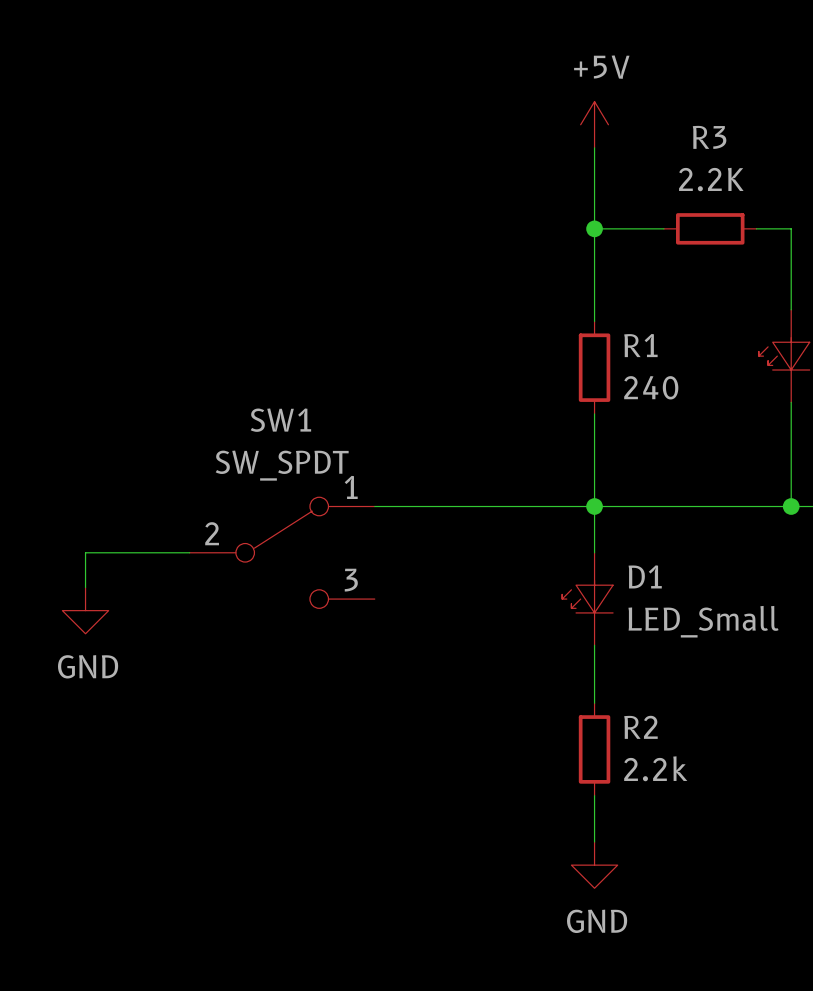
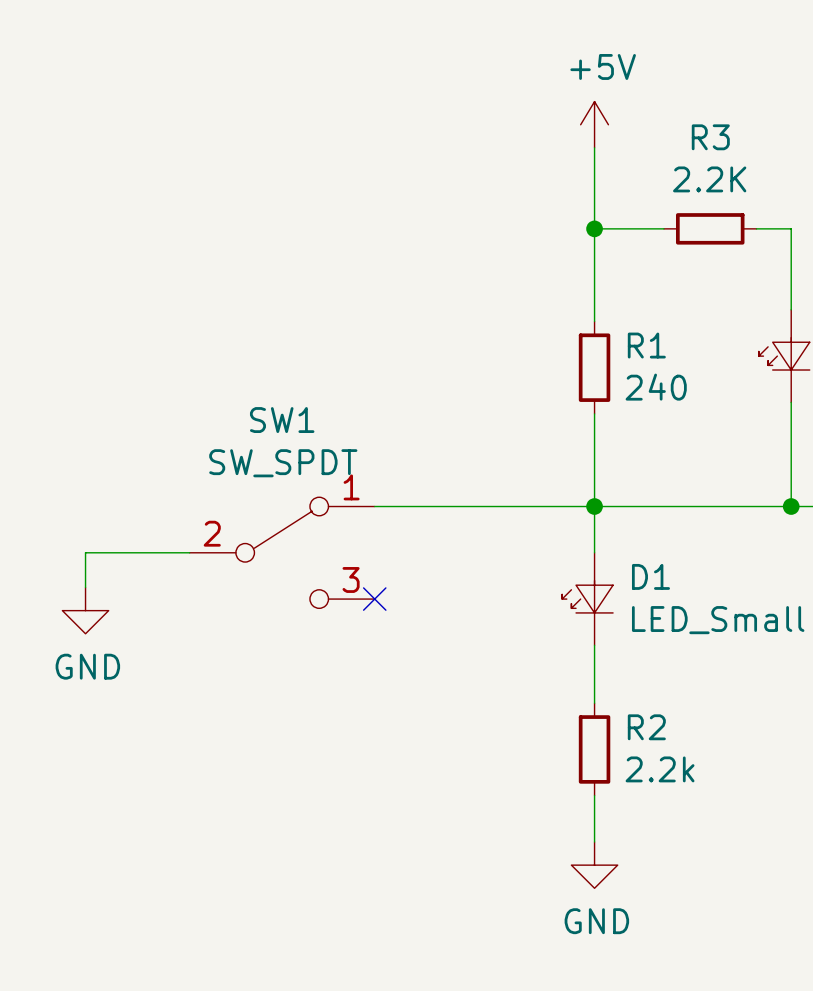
no-connect mark: none -> (374, 599)

